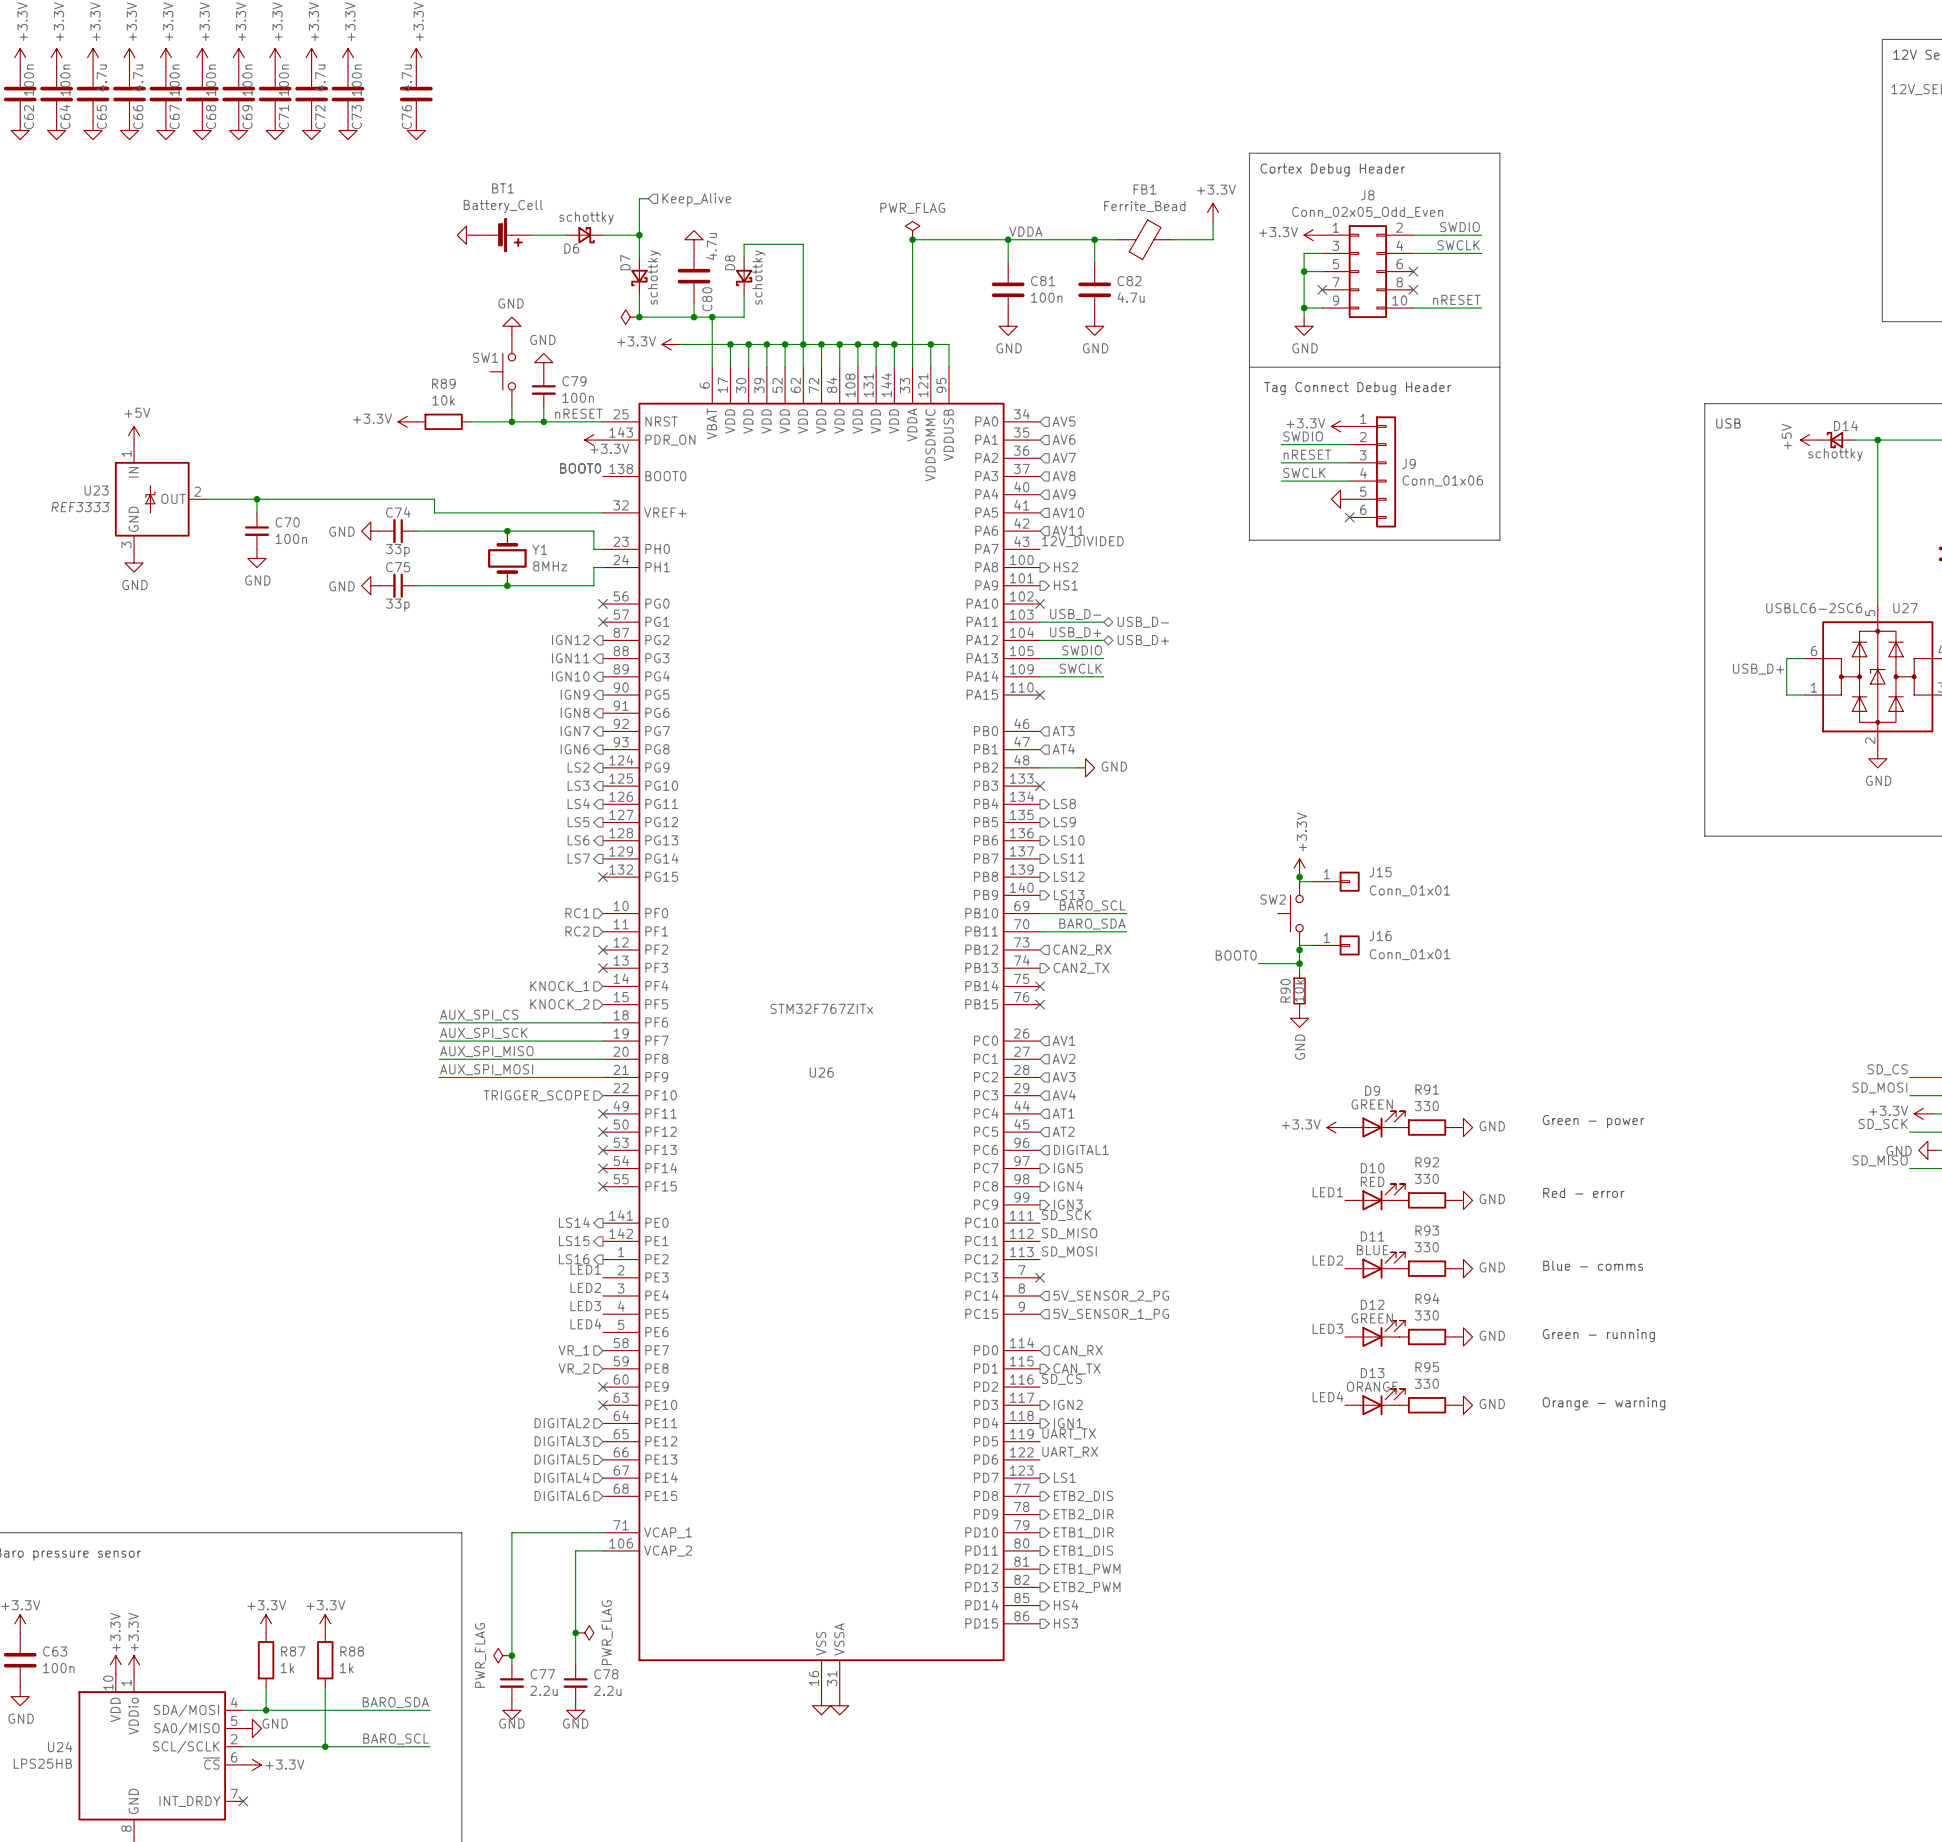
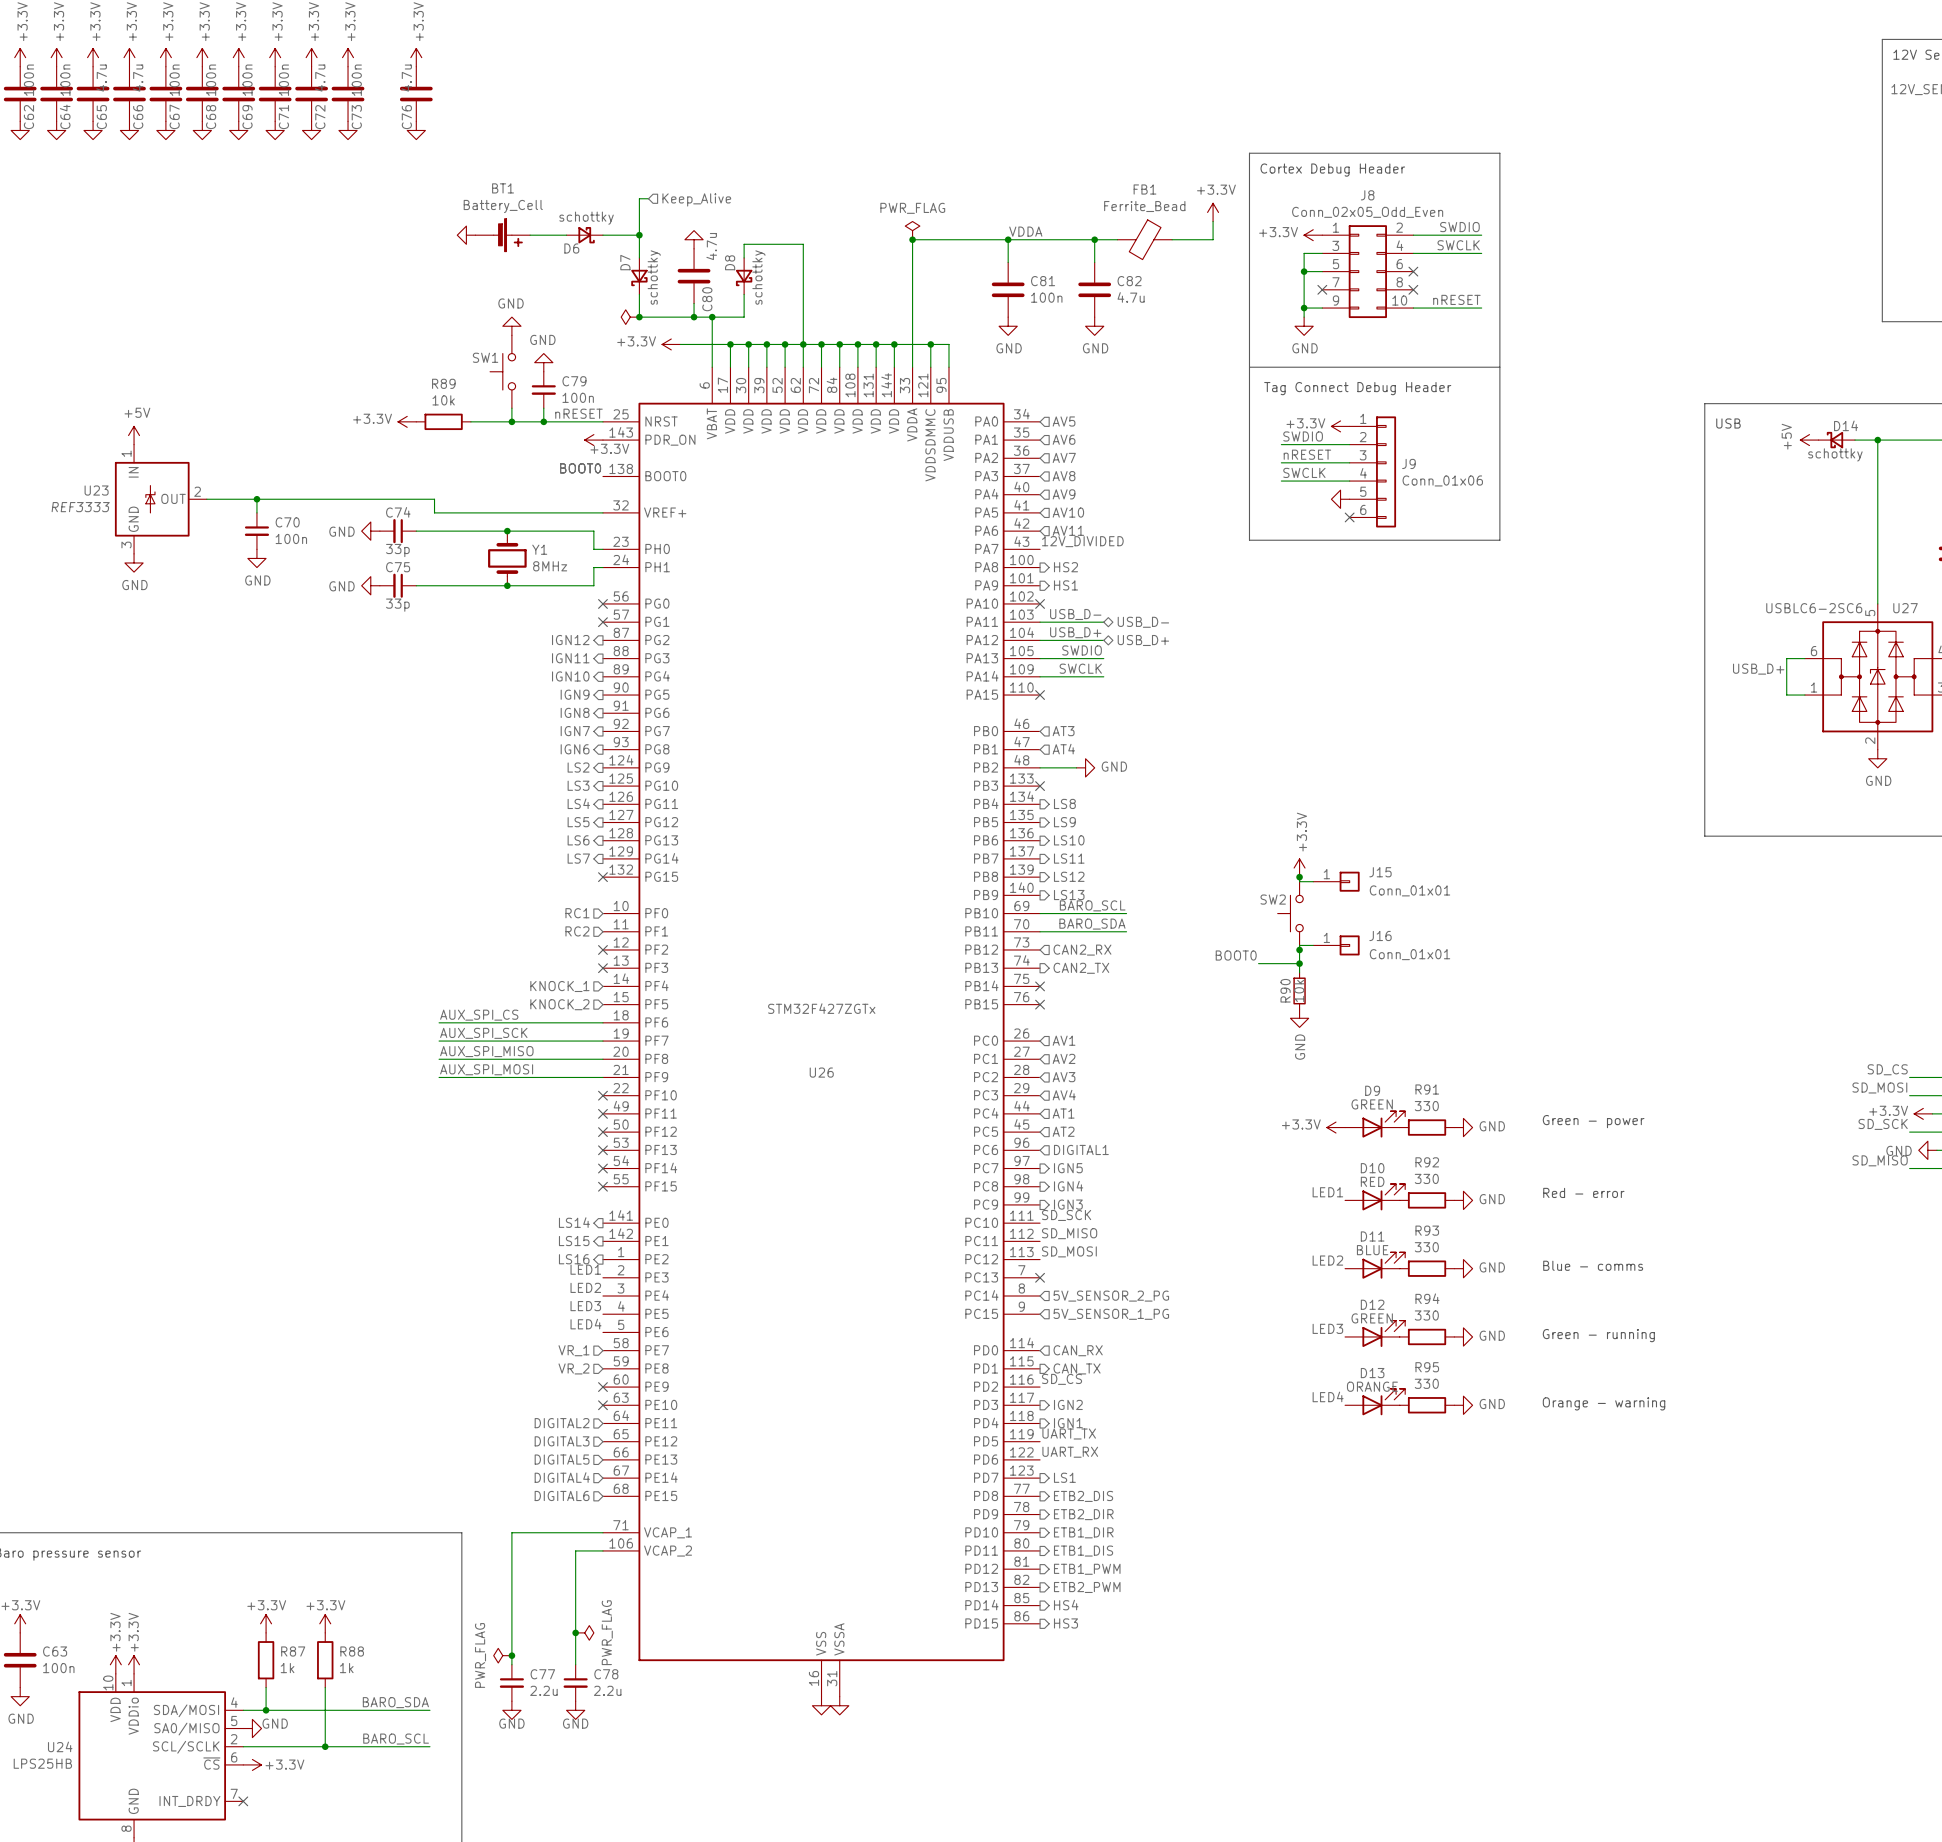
U26 value: STM32F767ZITx (821, 1008) -> STM32F427ZGTx (821, 1008)
hierarchical label: TRIGGER_SCOPE (536, 1095) -> none
no-connect mark: none -> (602, 1095)

